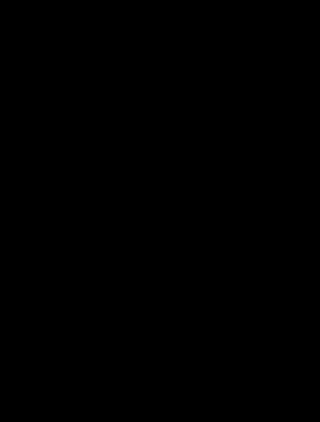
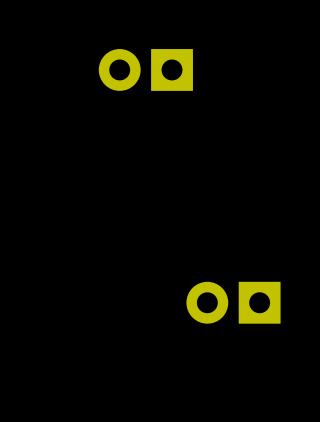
part: none -> (145, 69)
part: none -> (233, 302)

